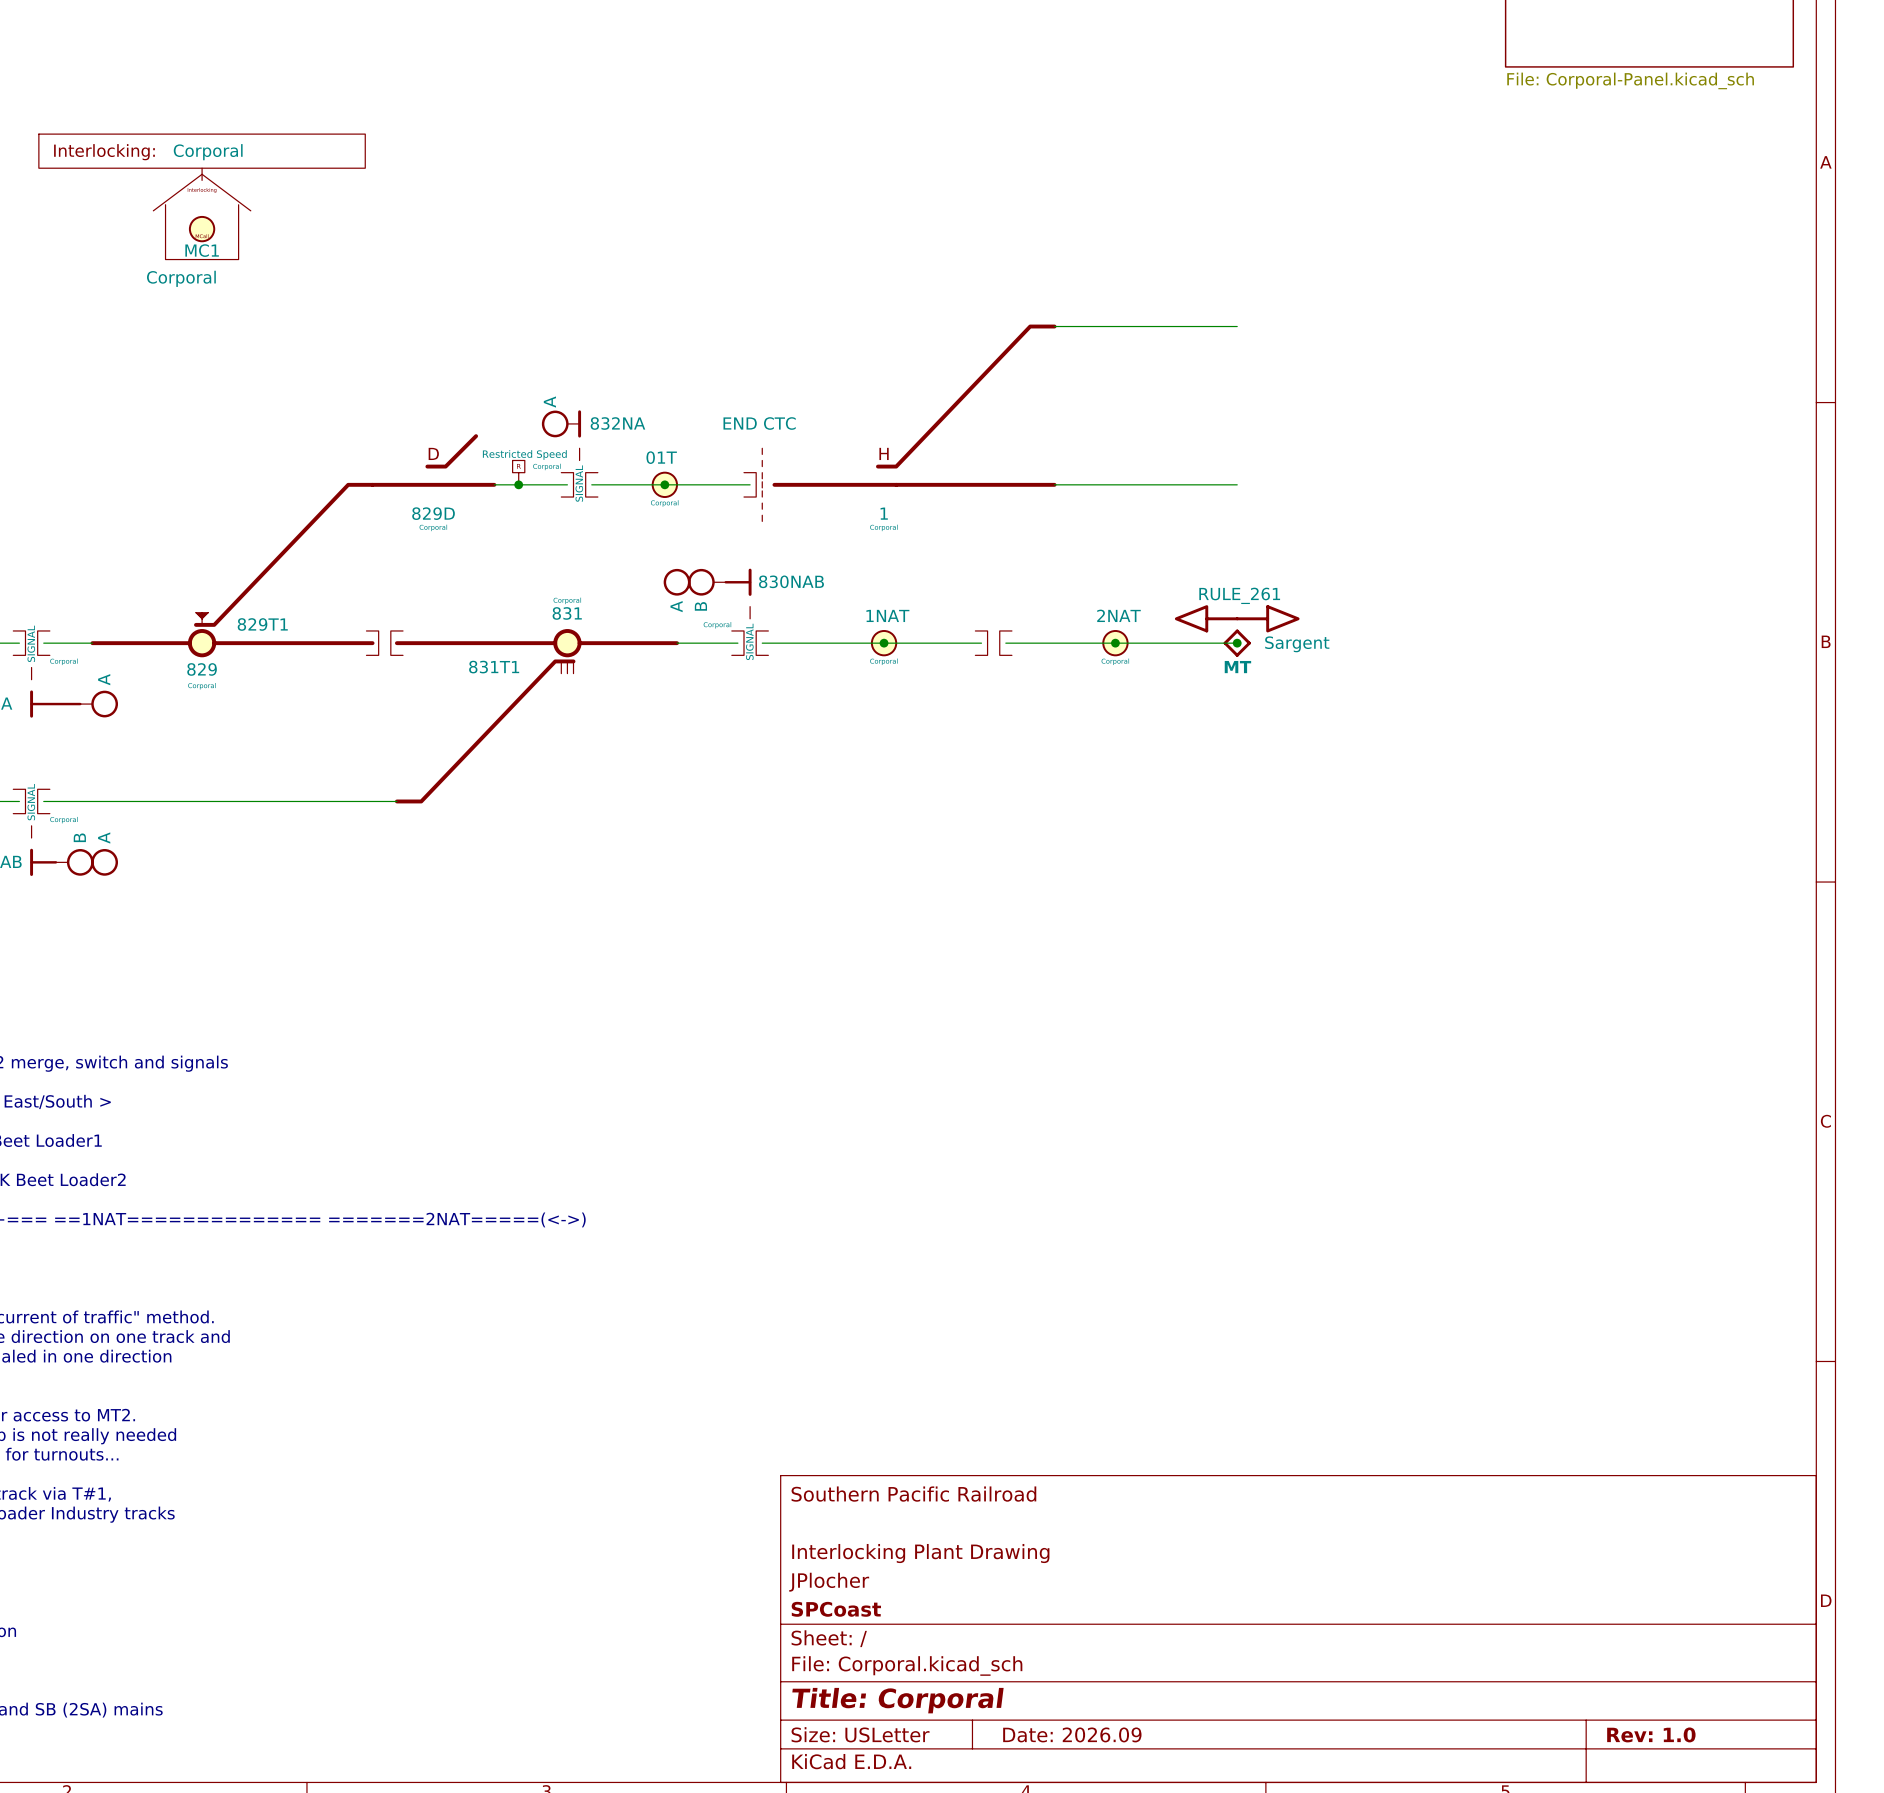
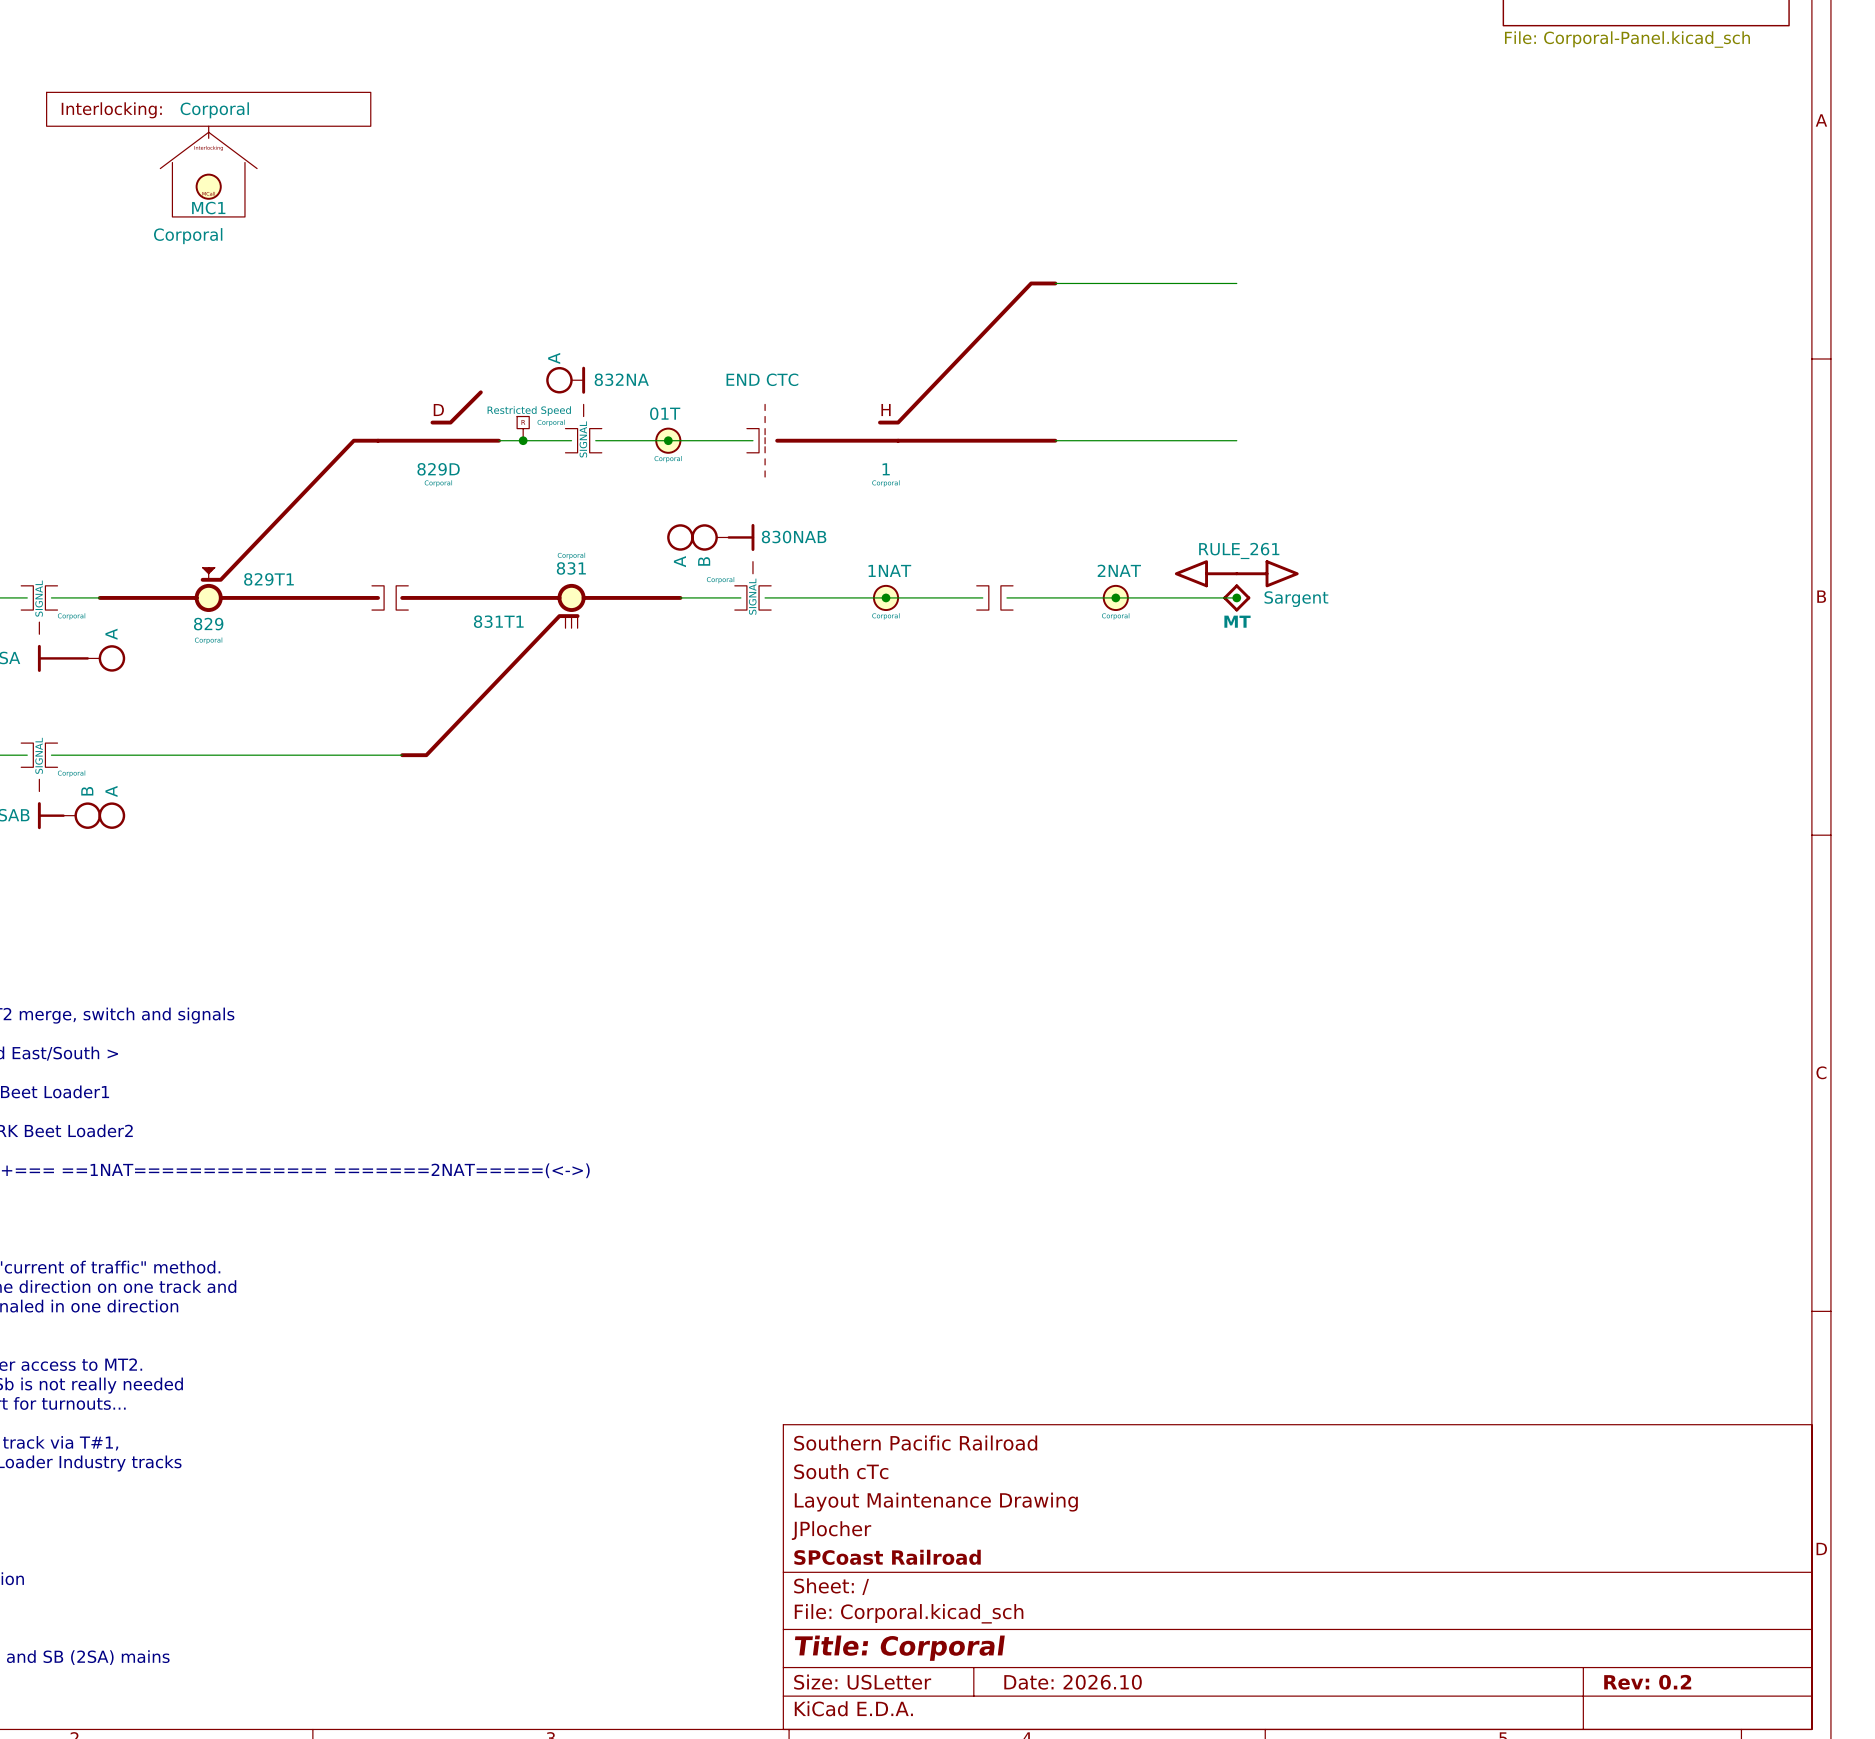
title block: none -> South cTc (841, 1471)
title block: Interlocking Plant Drawing (920, 1553) -> Layout Maintenance Drawing (936, 1502)
title block: SPCoast (836, 1609) -> SPCoast Railroad (887, 1557)
title block: Date: 2026.09 (1072, 1734) -> Date: 2026.10 (1073, 1682)
title block: Rev: 1.0 (1651, 1734) -> Rev: 0.2 (1647, 1682)

